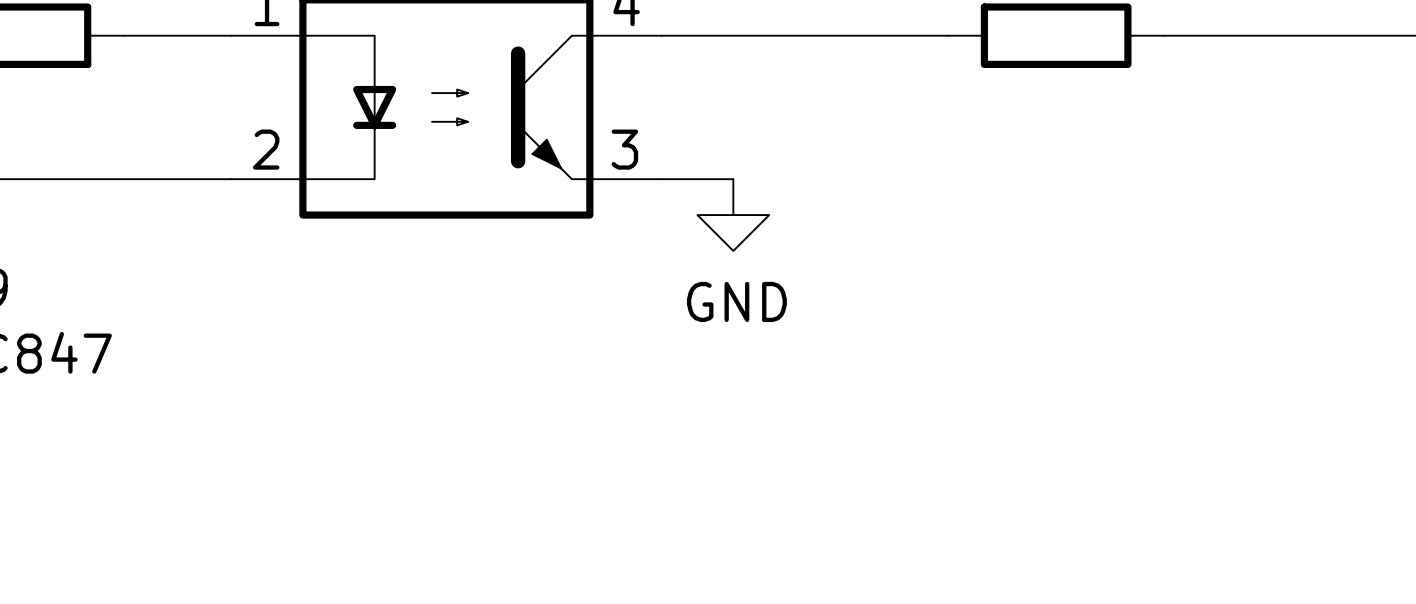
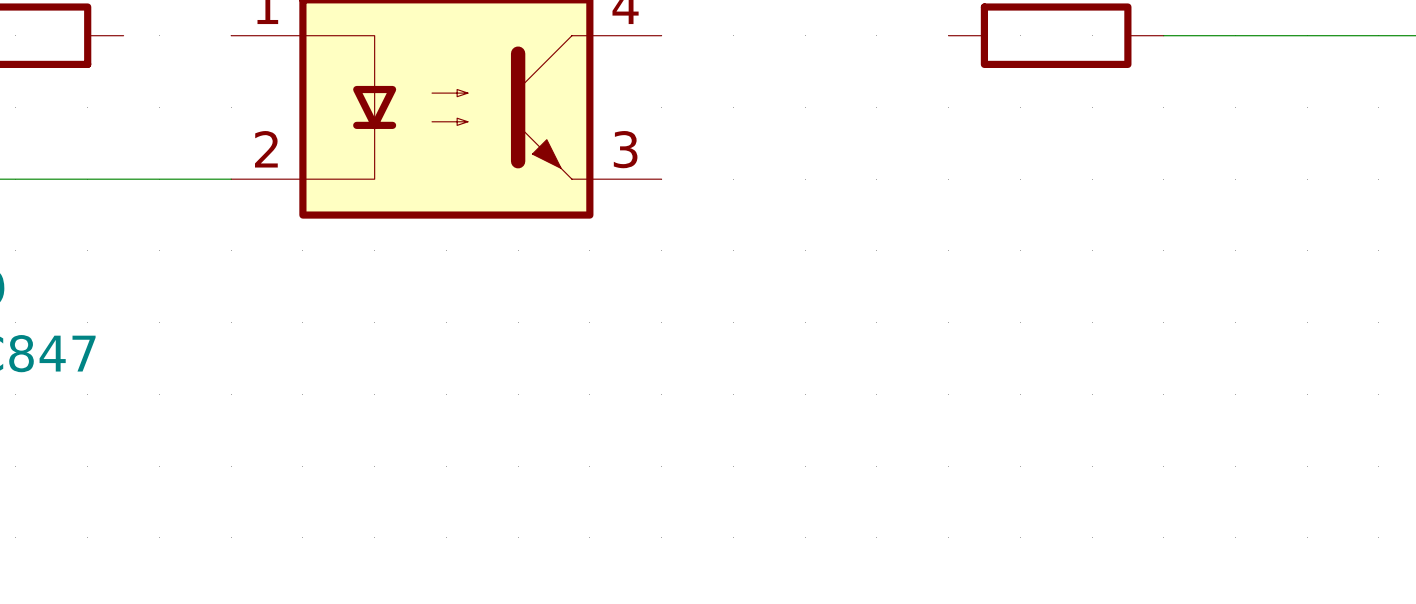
wire: (123, 35) (231, 35) -> none
wire: (661, 35) (948, 35) -> none
wire: (661, 179) (733, 179) -> none
power symbol: GND (733, 215) -> none

